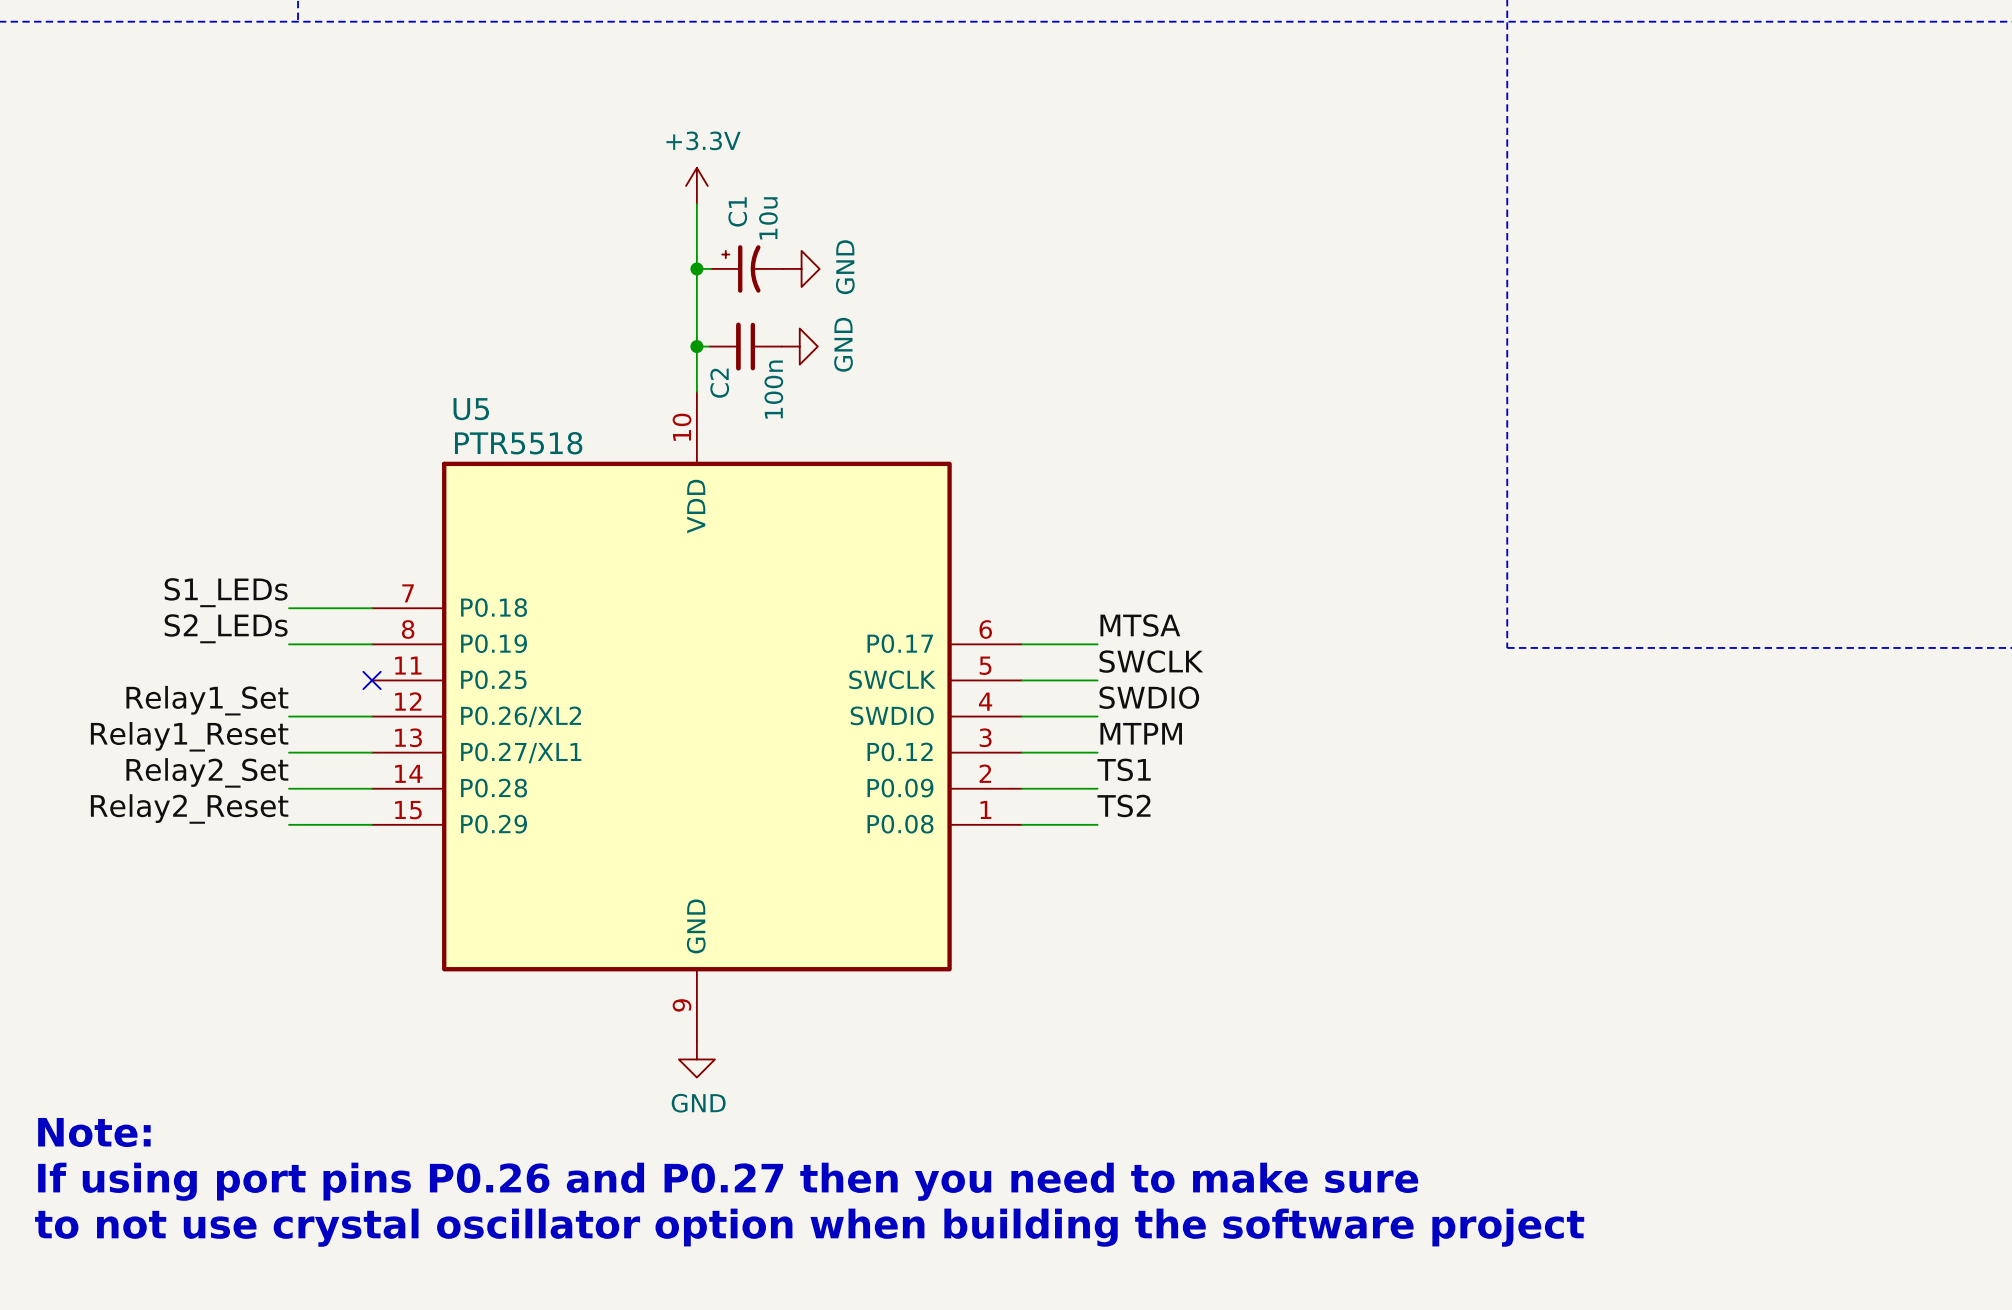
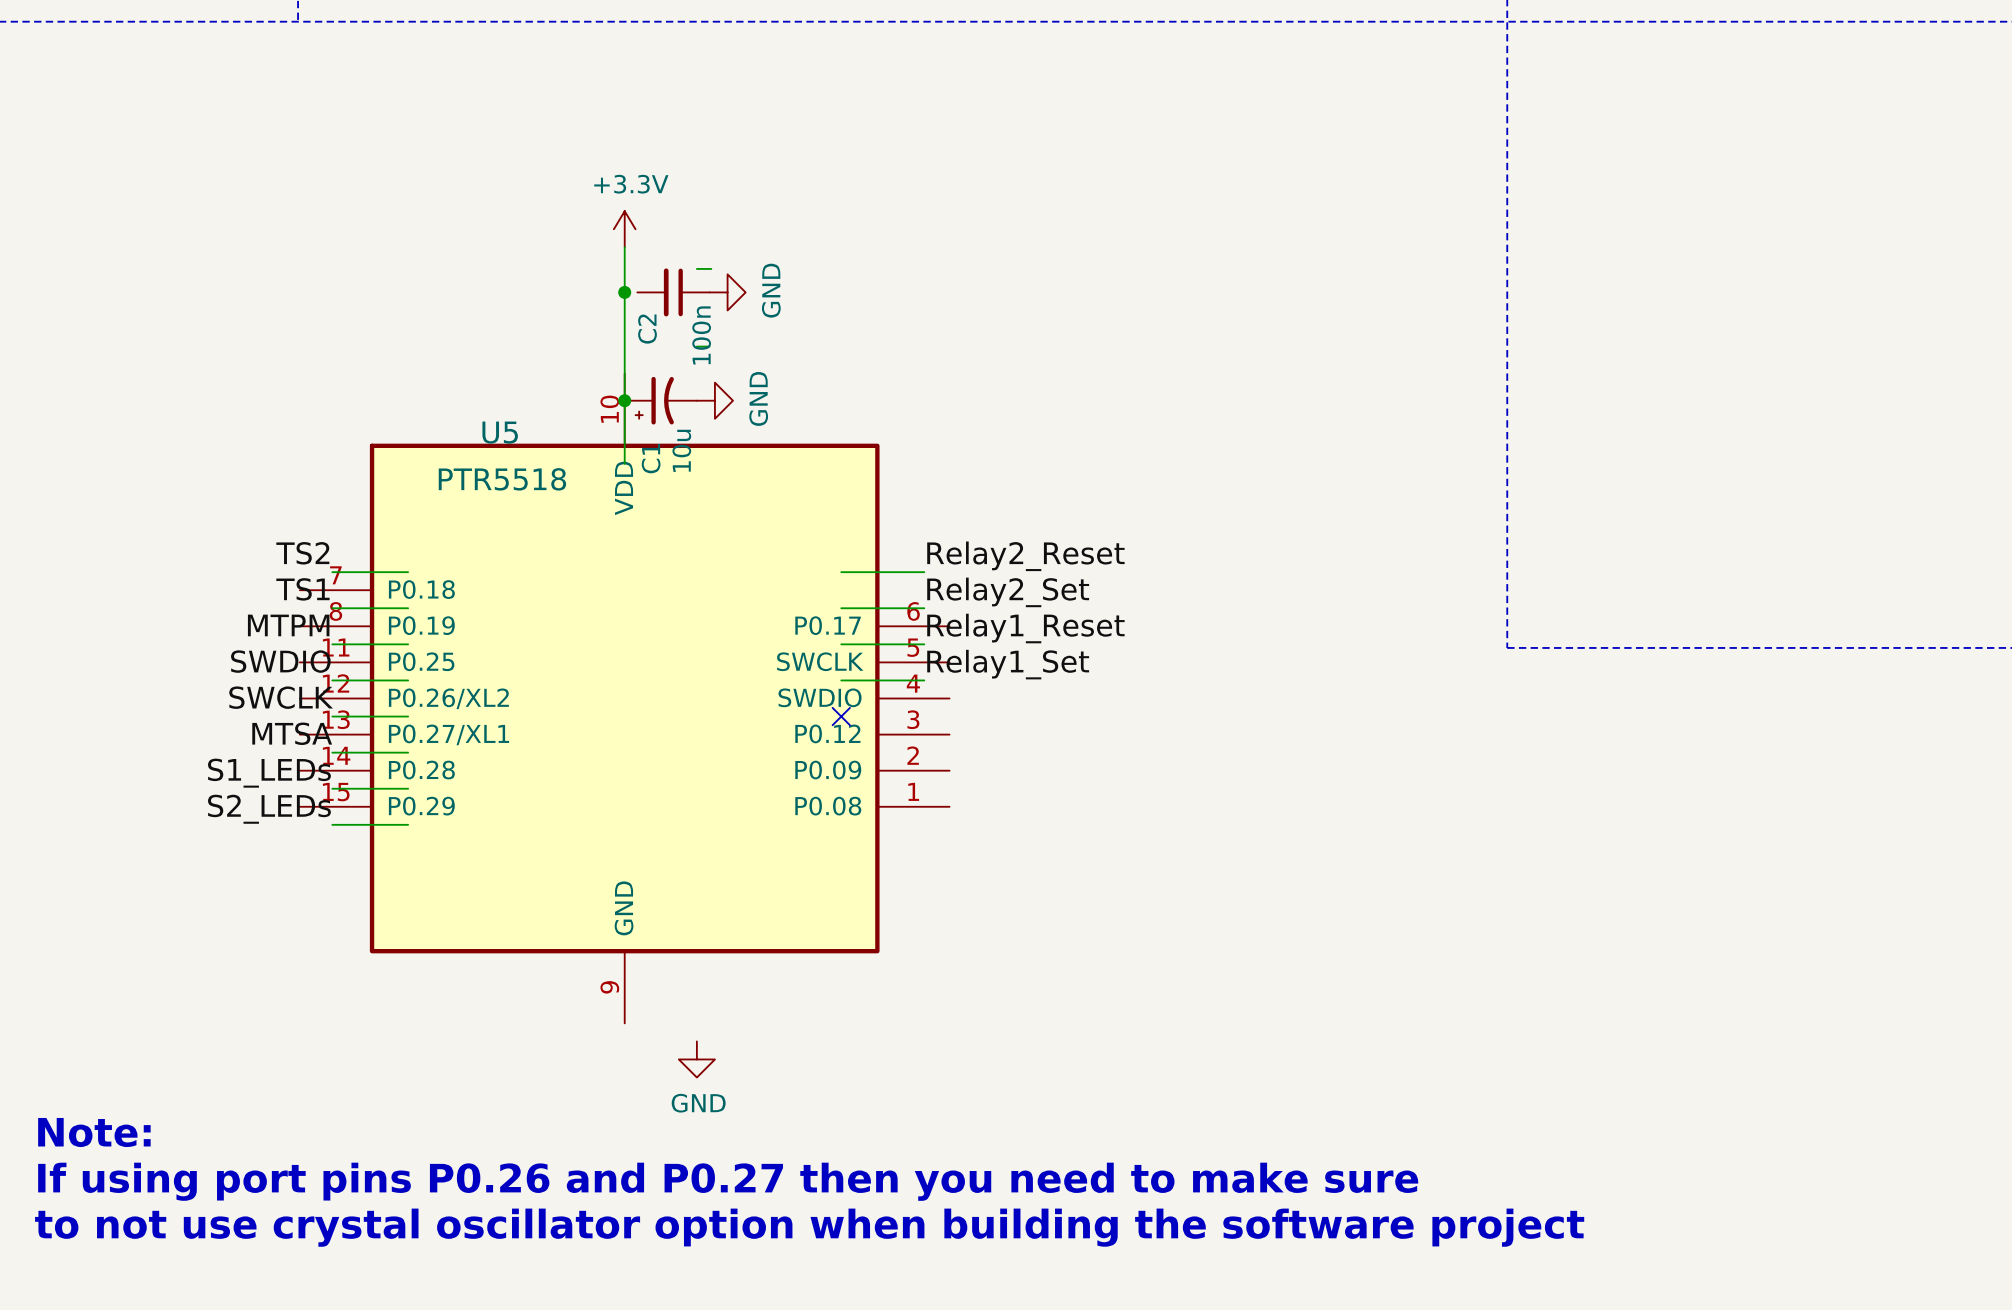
power symbol position: +3.3V (696, 185) -> +3.3V (624, 229)
wire: (696, 203) (696, 391) -> none
wire: none -> (624, 247) (624, 463)
junction: (696, 268) -> none
C1 flip: as is (741, 268) -> up-down (654, 400)
C1 position: (747, 268) -> (660, 400)
power symbol: GND (801, 268) -> none
junction: none -> (624, 292)
power symbol: none -> GND (727, 292)
junction: (696, 346) -> none
C2 position: (745, 346) -> (673, 292)
power symbol: GND (799, 346) -> none
junction: none -> (624, 400)
power symbol: none -> GND (714, 400)
U5 name position: U5 (471, 409) -> U5 (500, 432)
U5 value position: PTR5518 (518, 443) -> PTR5518 (502, 479)
label: none -> TS2 (302, 553)
label: none -> Relay2_Reset (1025, 556)
wire: none -> (332, 572) (408, 572)
label: none -> TS1 (302, 589)
label position: S1_LEDs (226, 592) -> S1_LEDs (269, 773)
label: none -> Relay2_Set (1008, 592)
wire: (289, 608) (332, 608) -> none
label: none -> MTPM (288, 625)
label: MTSA (1140, 625) -> none
label position: S2_LEDs (226, 628) -> S2_LEDs (269, 809)
label: none -> Relay1_Reset (1025, 628)
wire: (289, 644) (332, 644) -> none
wire: (1021, 644) (1097, 644) -> none
label: none -> SWDIO (280, 661)
label: SWCLK (1151, 661) -> none
label: none -> Relay1_Set (1008, 664)
wire: none -> (332, 680) (408, 680)
no-connect mark: (372, 680) -> none
wire: (1021, 680) (1097, 680) -> none
label: none -> SWCLK (281, 697)
label: SWDIO (1149, 697) -> none
label: Relay1_Set (207, 700) -> none
wire: (289, 716) (332, 716) -> none
U5 position: (696, 716) -> (624, 698)
no-connect mark: none -> (841, 716)
wire: (1021, 716) (1097, 716) -> none
label: none -> MTSA (292, 733)
label: MTPM (1141, 733) -> none
label: Relay1_Reset (189, 736) -> none
wire: (289, 752) (332, 752) -> none
wire: (1021, 752) (1097, 752) -> none
label: TS1 (1124, 769) -> none
label: Relay2_Set (207, 772) -> none
wire: (289, 788) (332, 788) -> none
wire: (1021, 788) (1097, 788) -> none
label: TS2 (1123, 805) -> none
label: Relay2_Reset (189, 808) -> none
wire: (289, 824) (332, 824) -> none
wire: (1021, 824) (1097, 824) -> none

